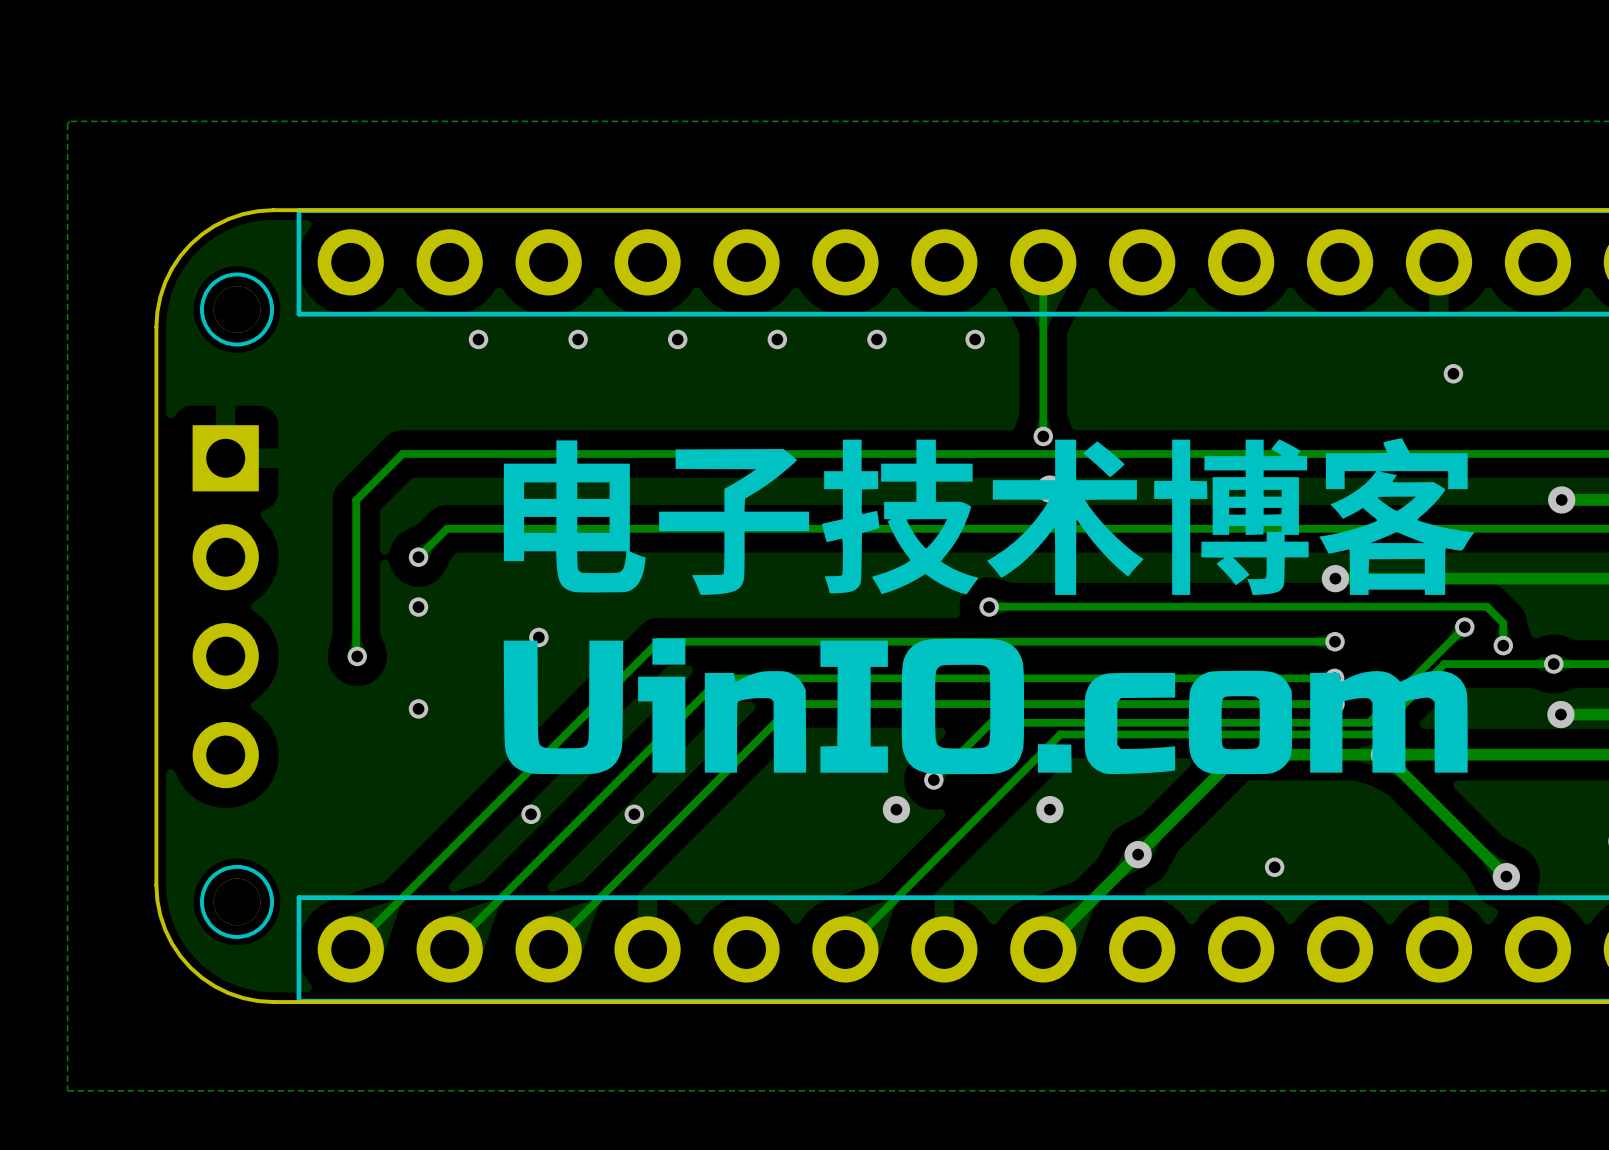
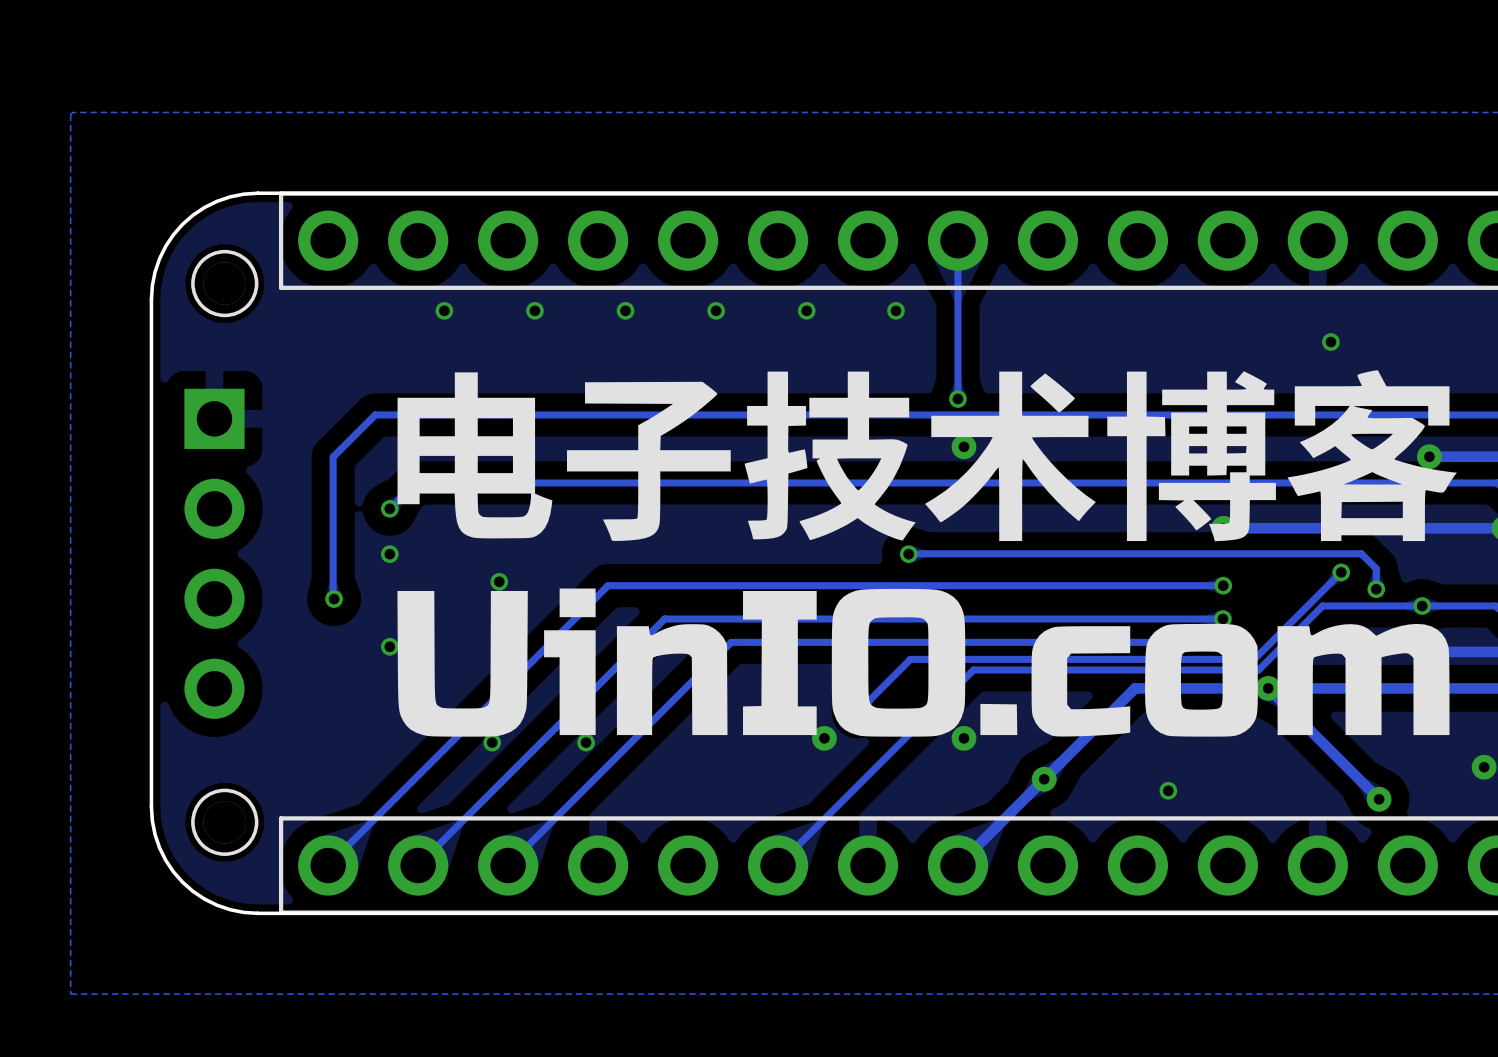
drawing shape: [503, 438, 1475, 775] -> [397, 370, 1457, 737]

